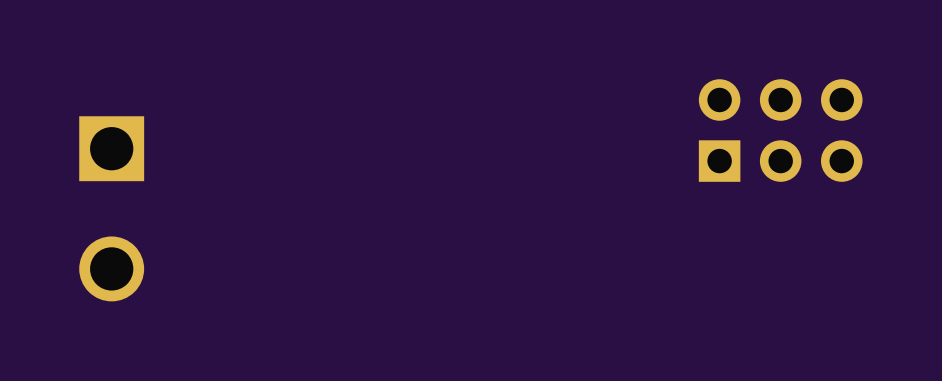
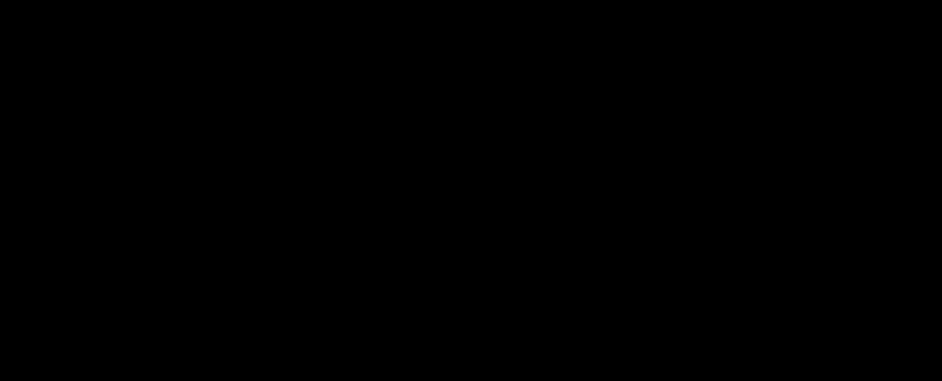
part: (780, 130) -> none
part: (111, 208) -> none

